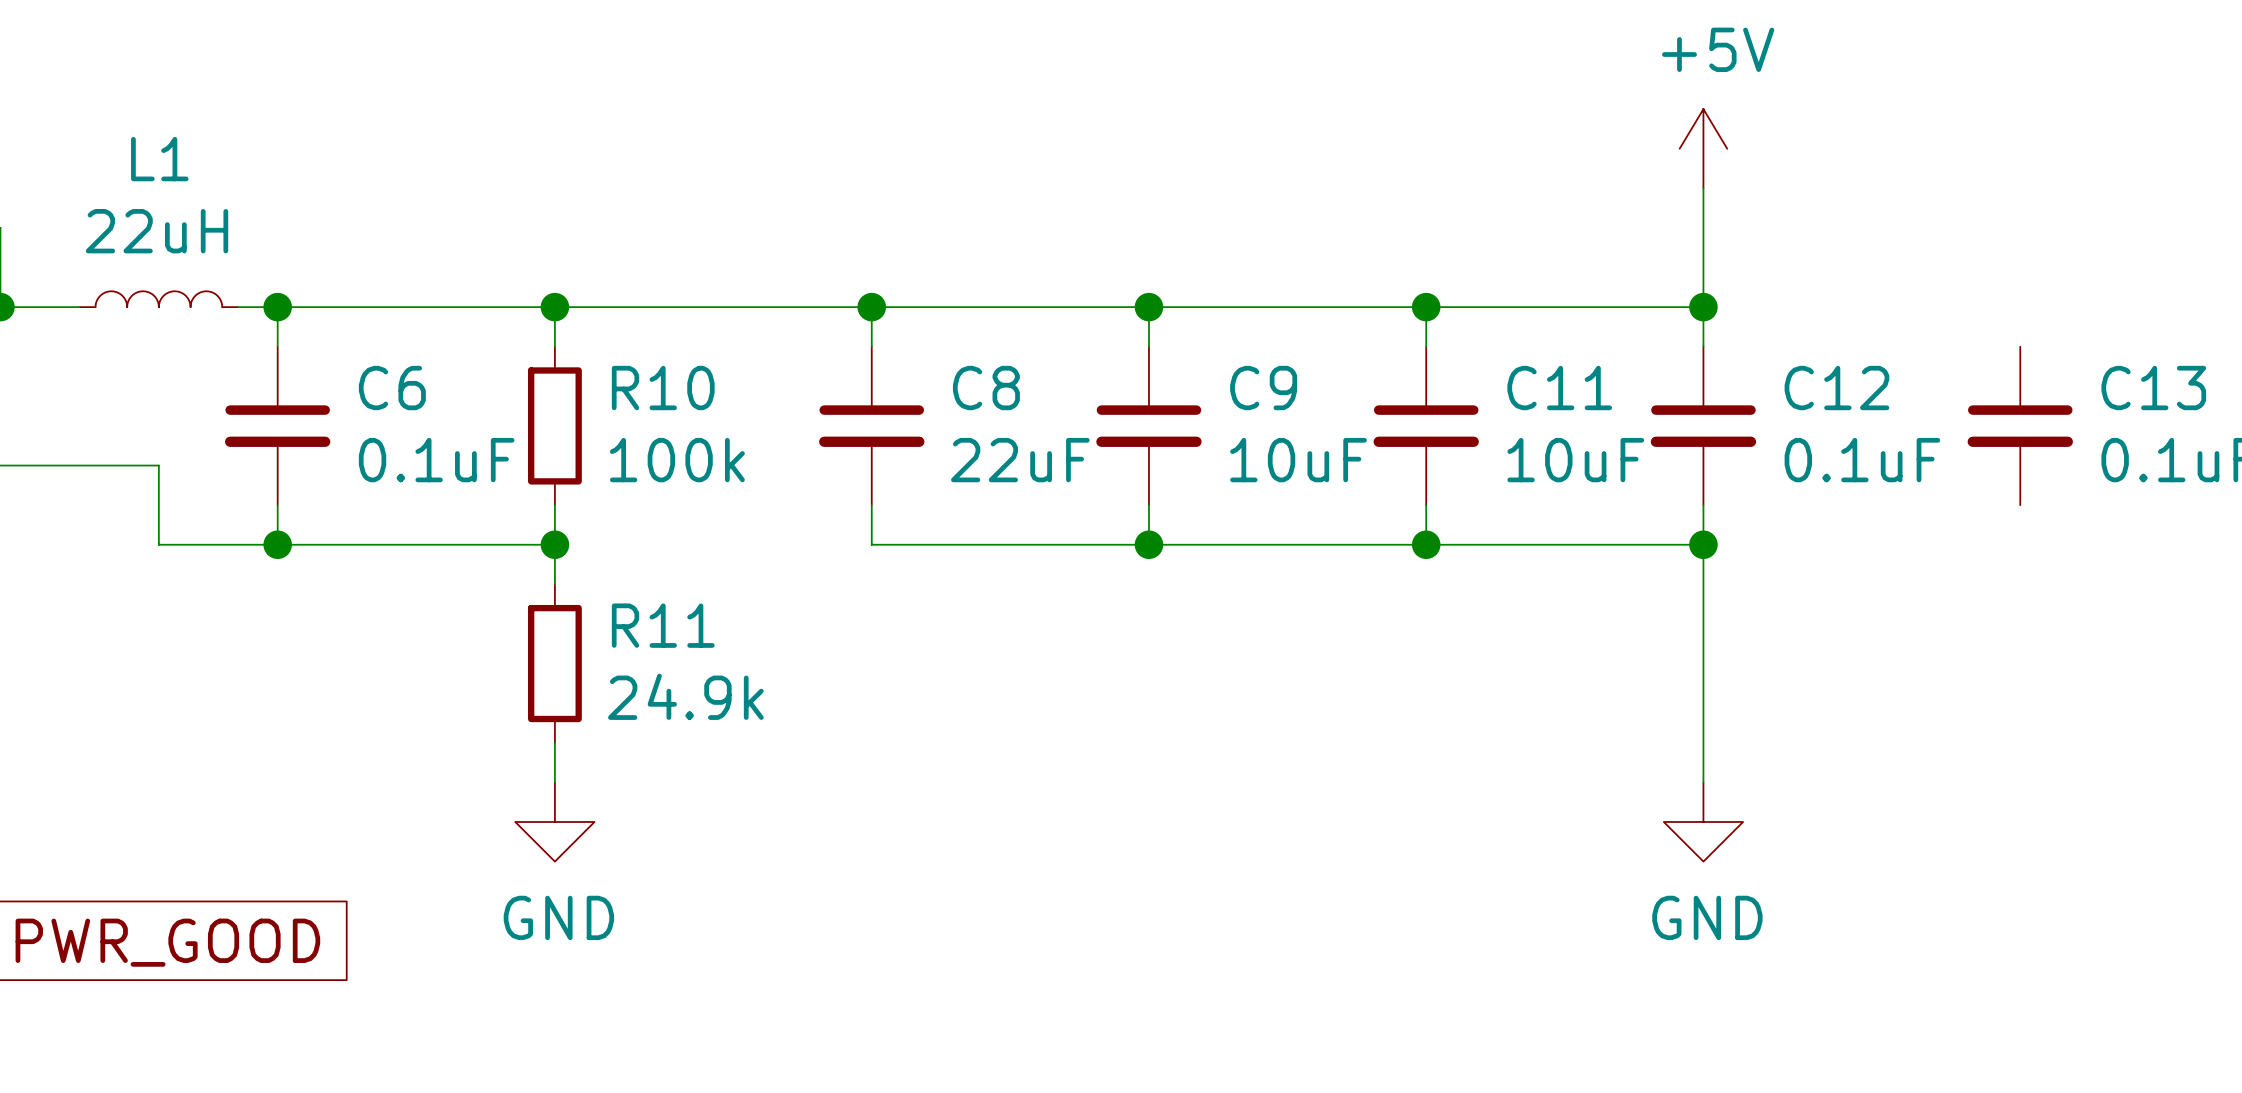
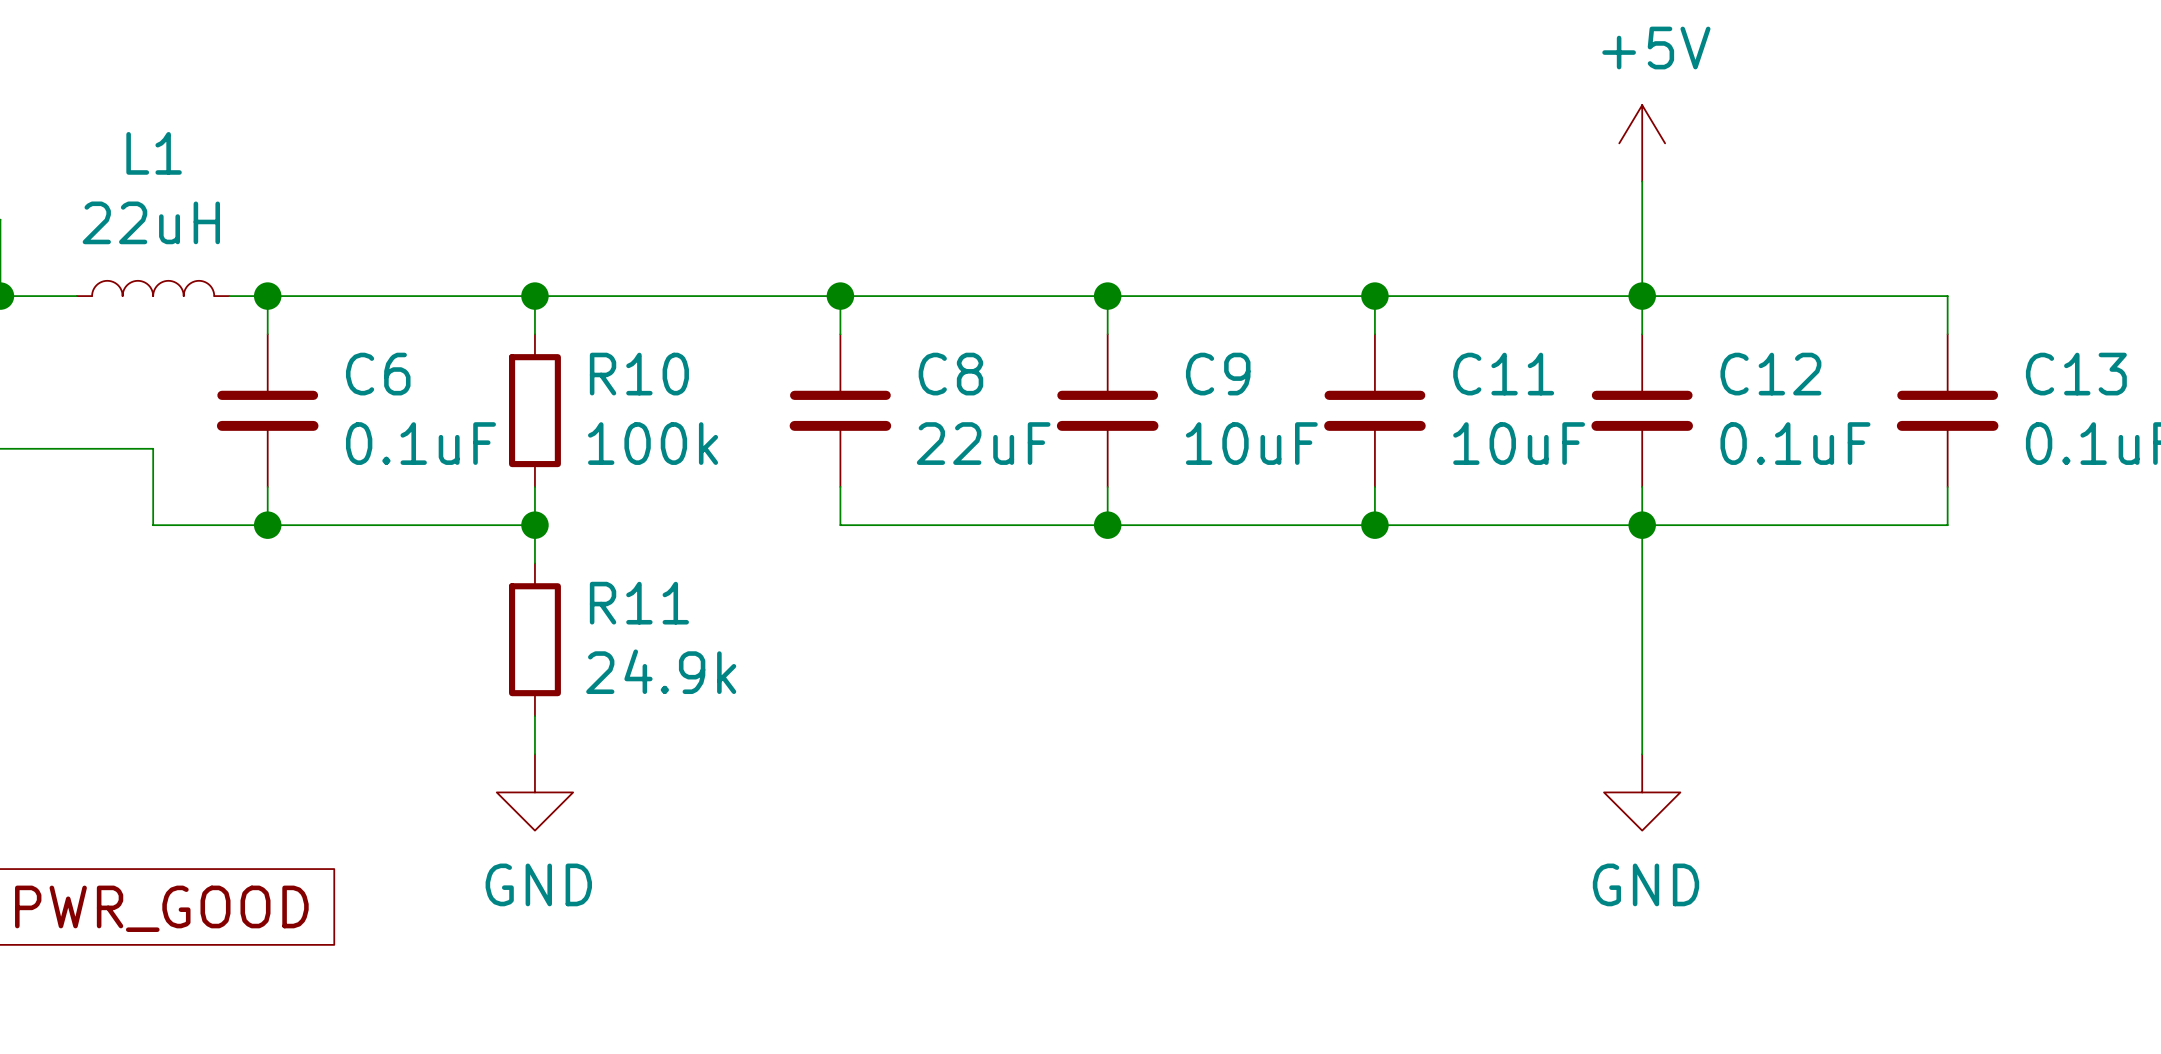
wire: none -> (1642, 296) (1947, 296) (1947, 334)
wire: none -> (1947, 486) (1947, 525) (1642, 525)

